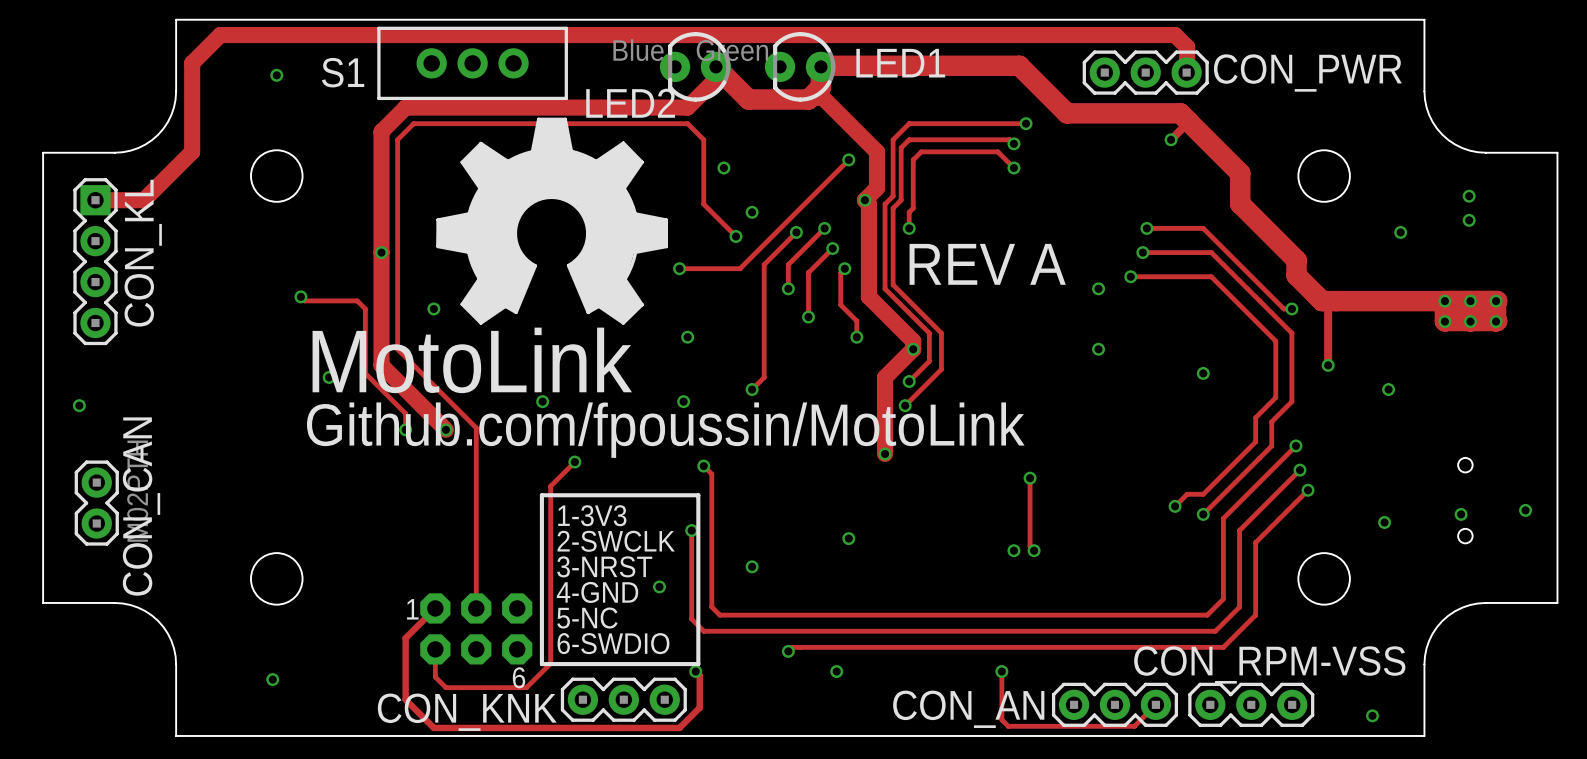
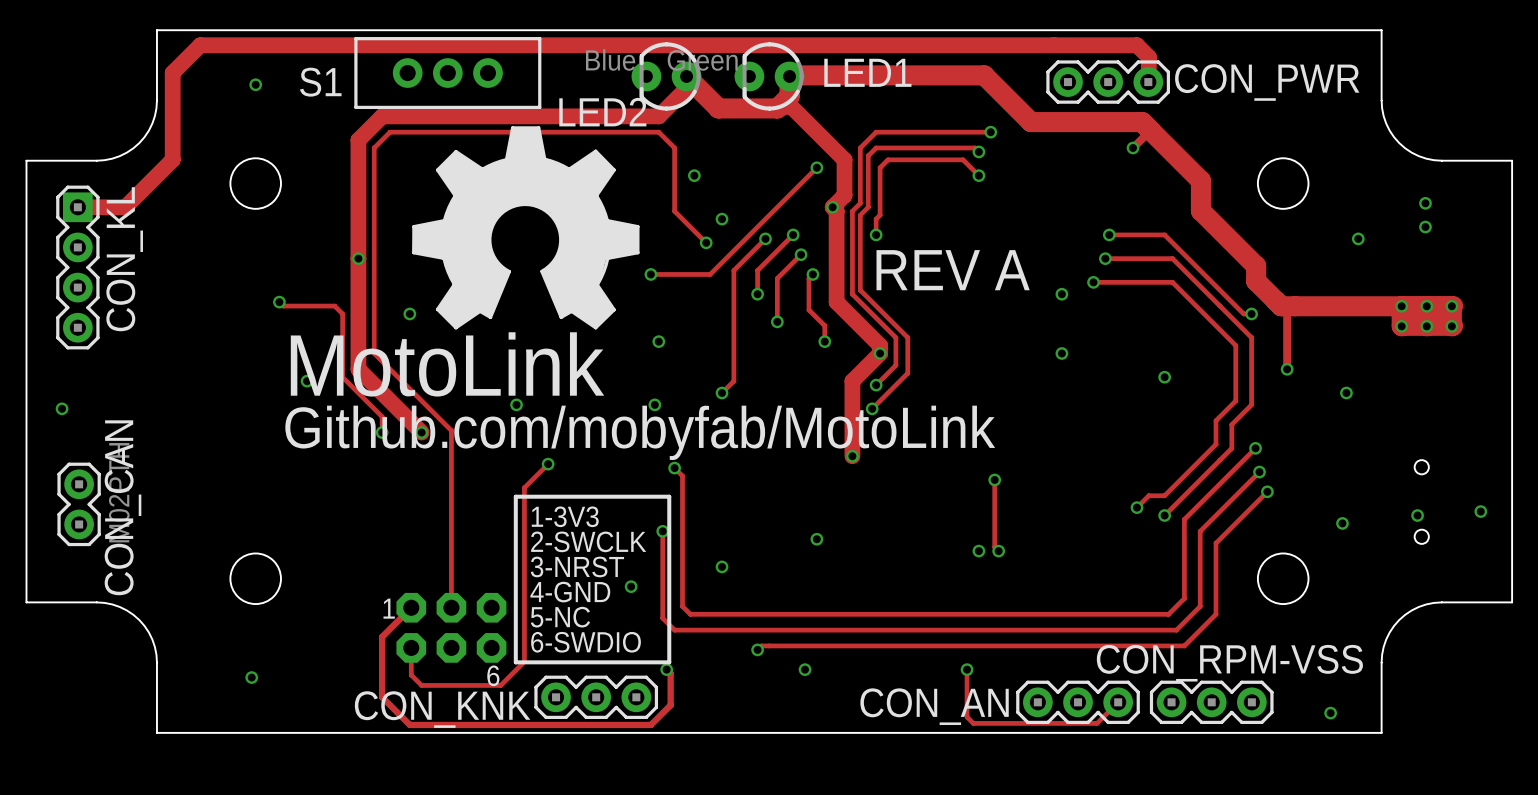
text: Github.com/fpoussin/MotoLink (665, 430) -> Github.com/mobyfab/MotoLink (640, 432)

